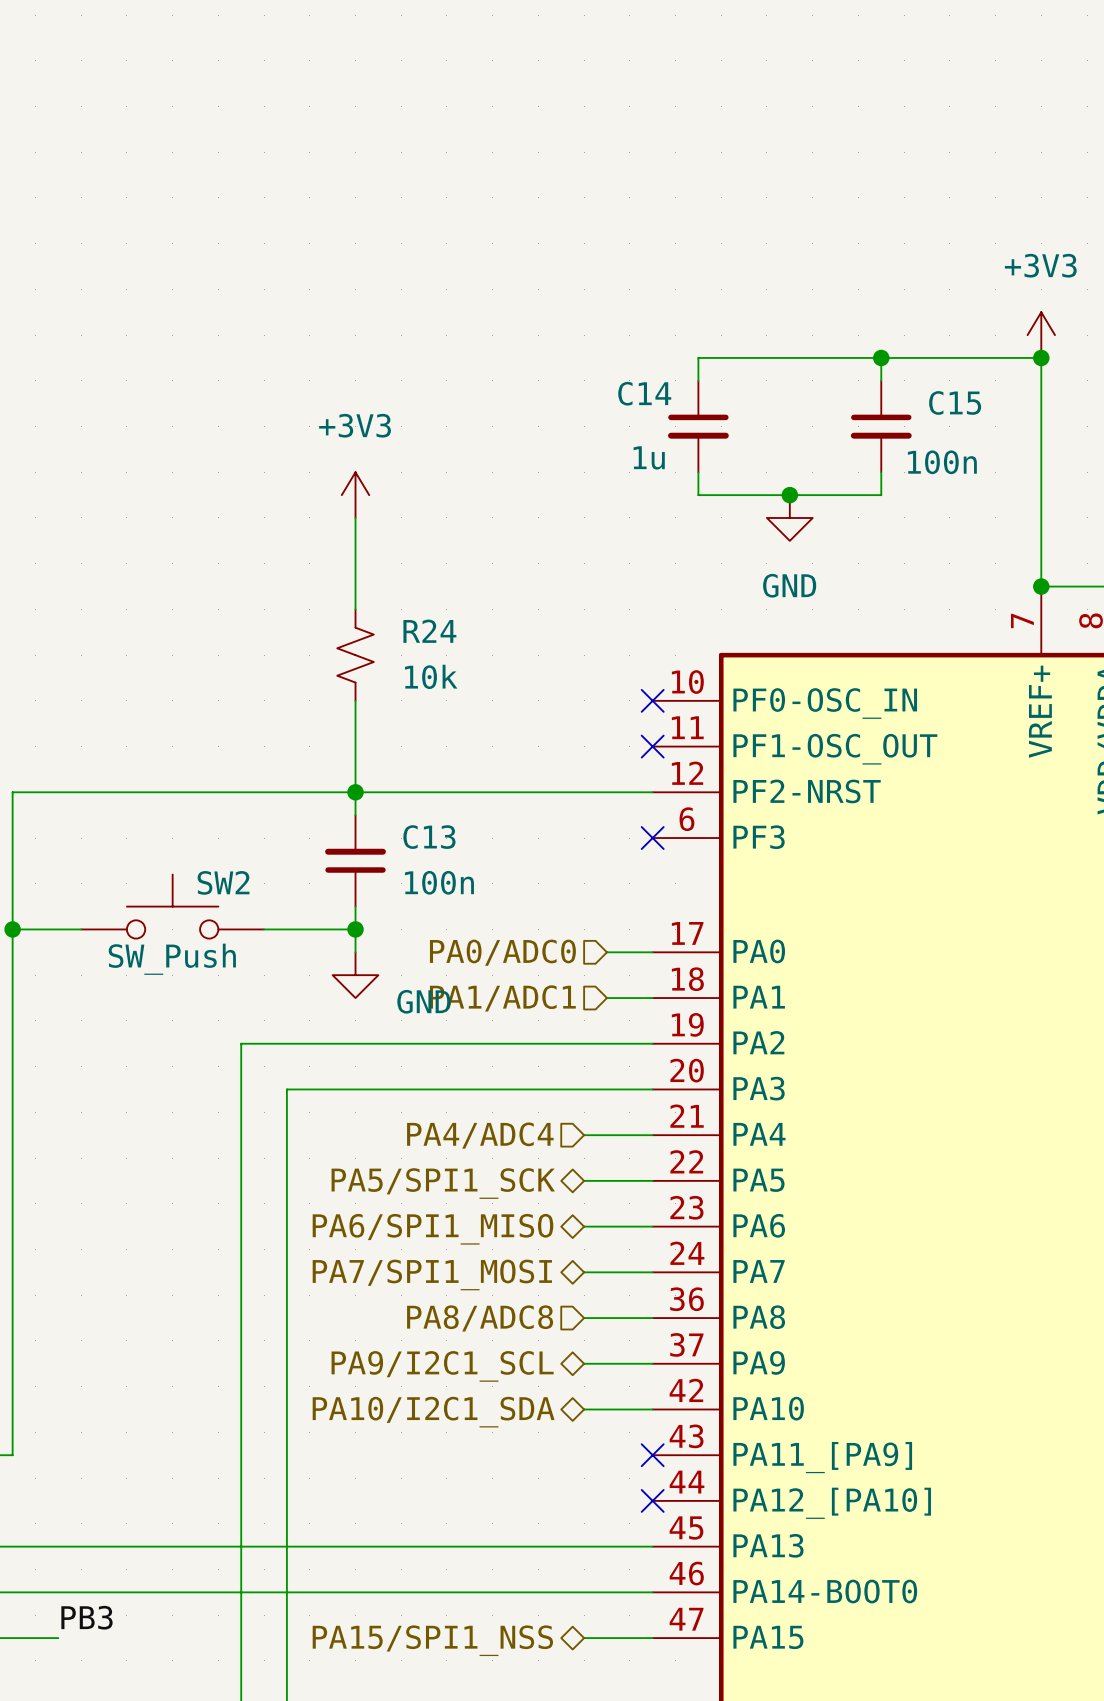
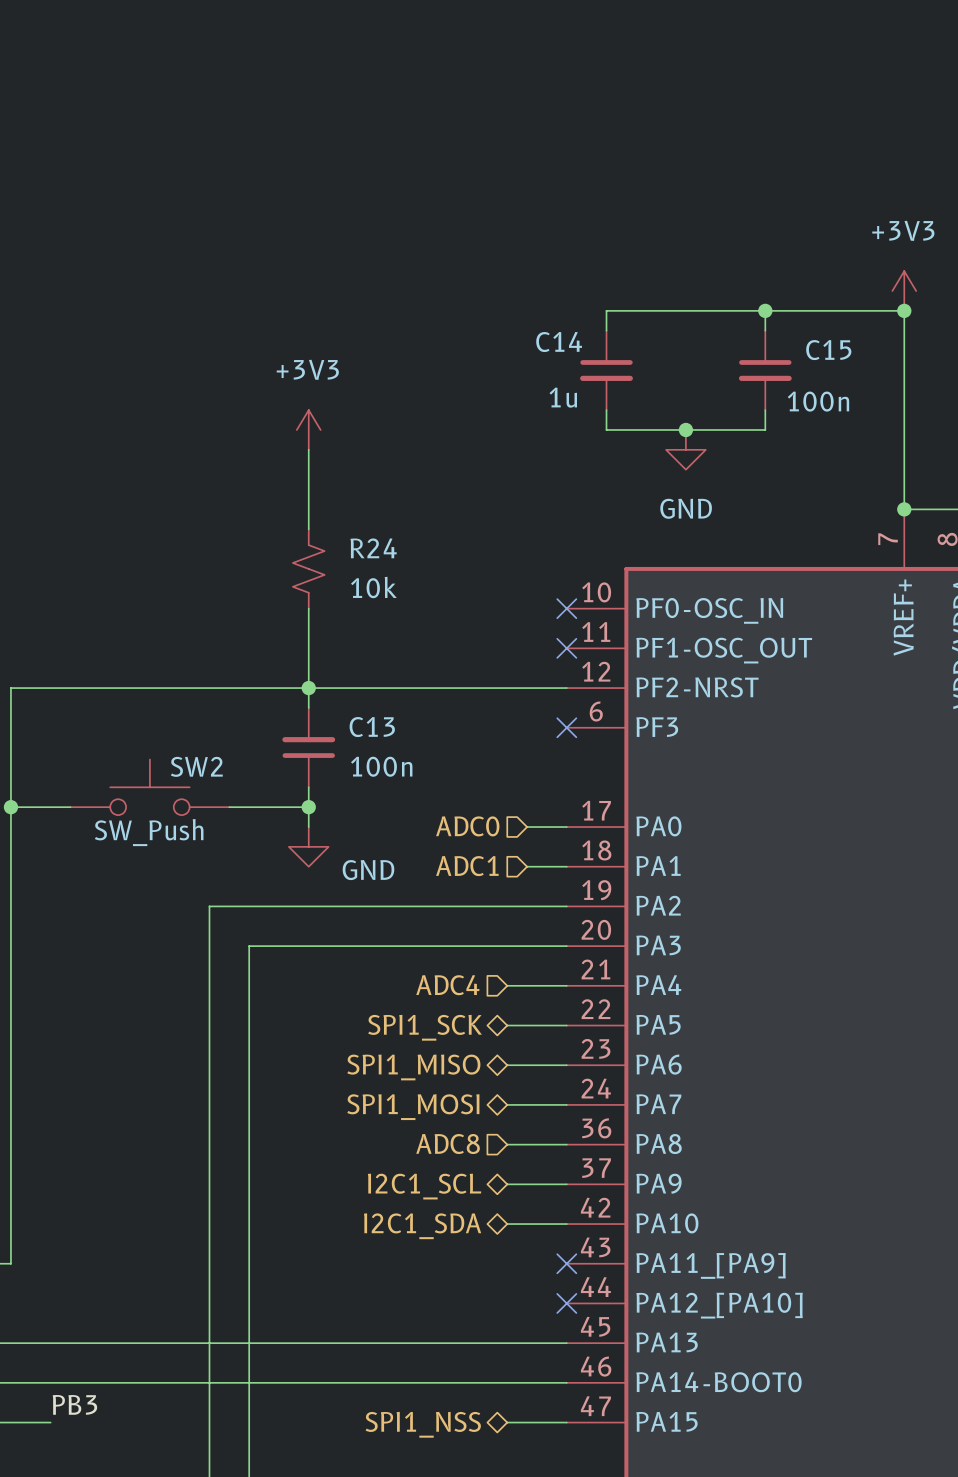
hierarchical label: PA0/ADC0 (502, 952) -> ADC0 (467, 826)
hierarchical label: PA1/ADC1 (502, 998) -> ADC1 (467, 866)
hierarchical label: PA4/ADC4 (480, 1135) -> ADC4 (447, 985)
hierarchical label: PA5/SPI1_SCK (443, 1183) -> SPI1_SCK (425, 1027)
hierarchical label: PA6/SPI1_MISO (432, 1229) -> SPI1_MISO (413, 1067)
hierarchical label: PA7/SPI1_MOSI (432, 1274) -> SPI1_MOSI (413, 1107)
hierarchical label: PA8/ADC8 (480, 1318) -> ADC8 (448, 1144)
hierarchical label: PA9/I2C1_SCL (442, 1366) -> I2C1_SCL (424, 1186)
hierarchical label: PA10/I2C1_SDA (433, 1412) -> I2C1_SDA (422, 1226)
hierarchical label: PA15/SPI1_NSS (432, 1640) -> SPI1_NSS (423, 1424)

